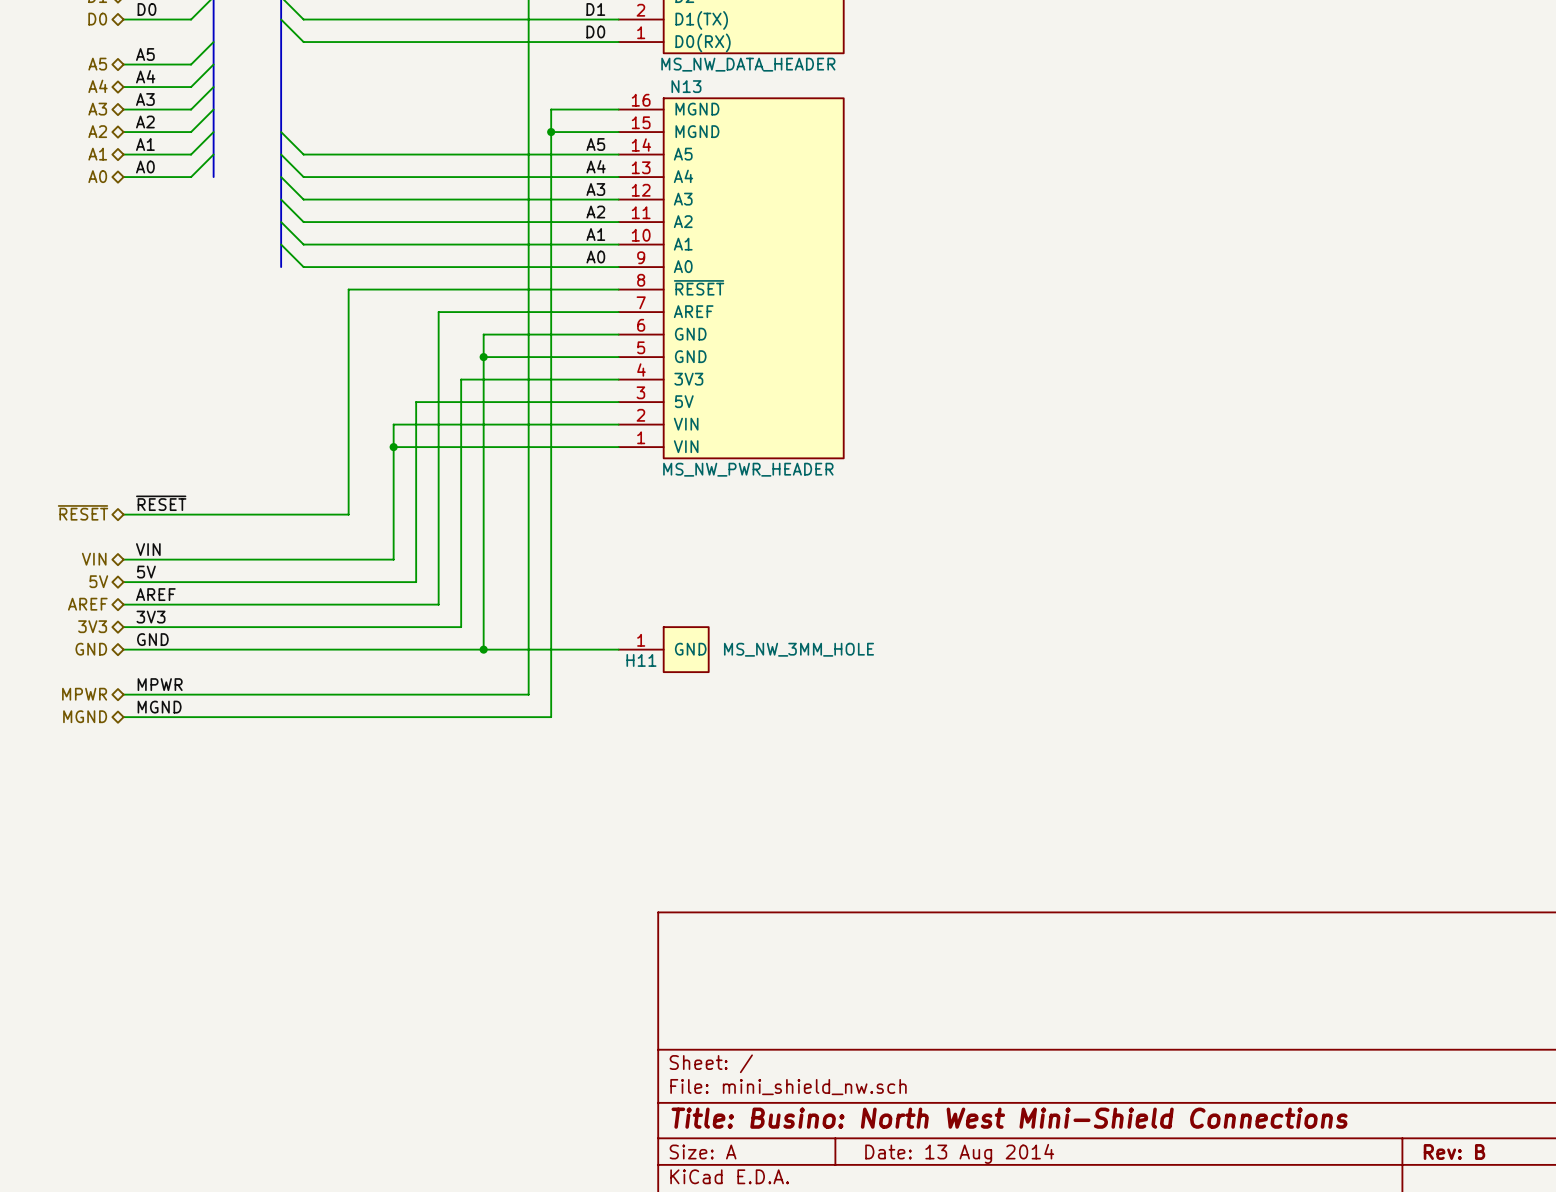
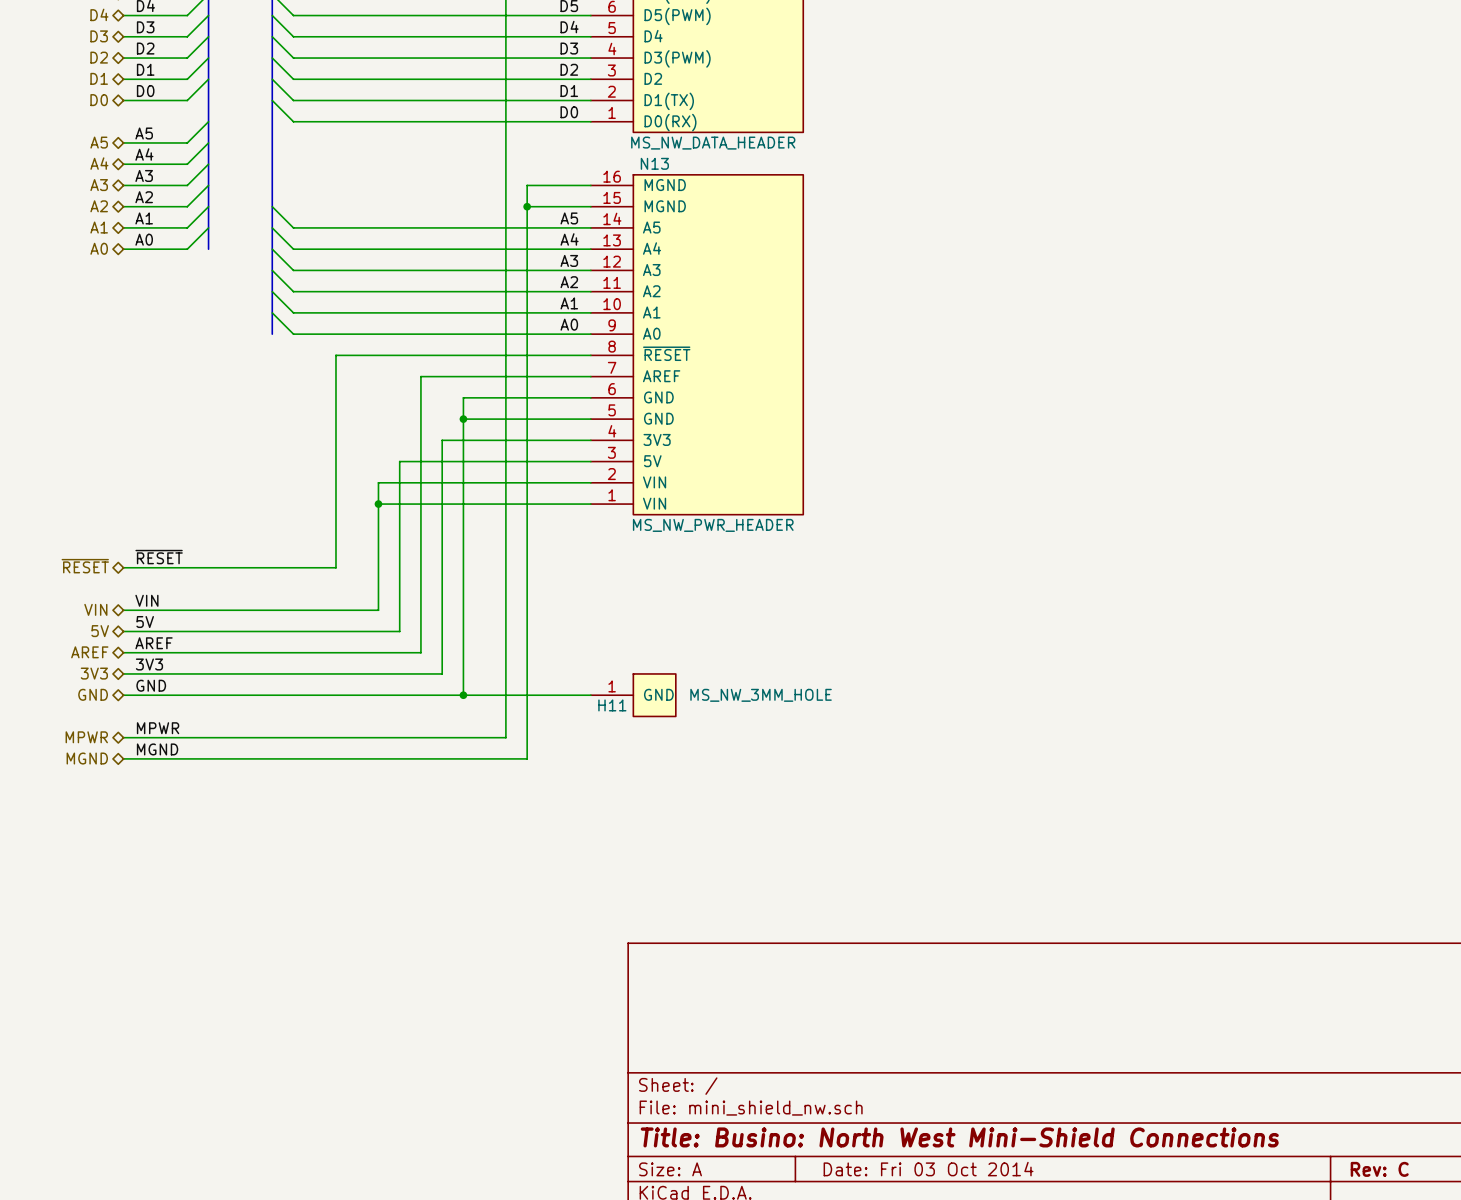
title block: Rev: B (1454, 1152) -> Rev: C (1379, 1169)
title block: Date: 13 Aug 2014 (959, 1153) -> Date: Fri 03 Oct 2014 (928, 1169)

